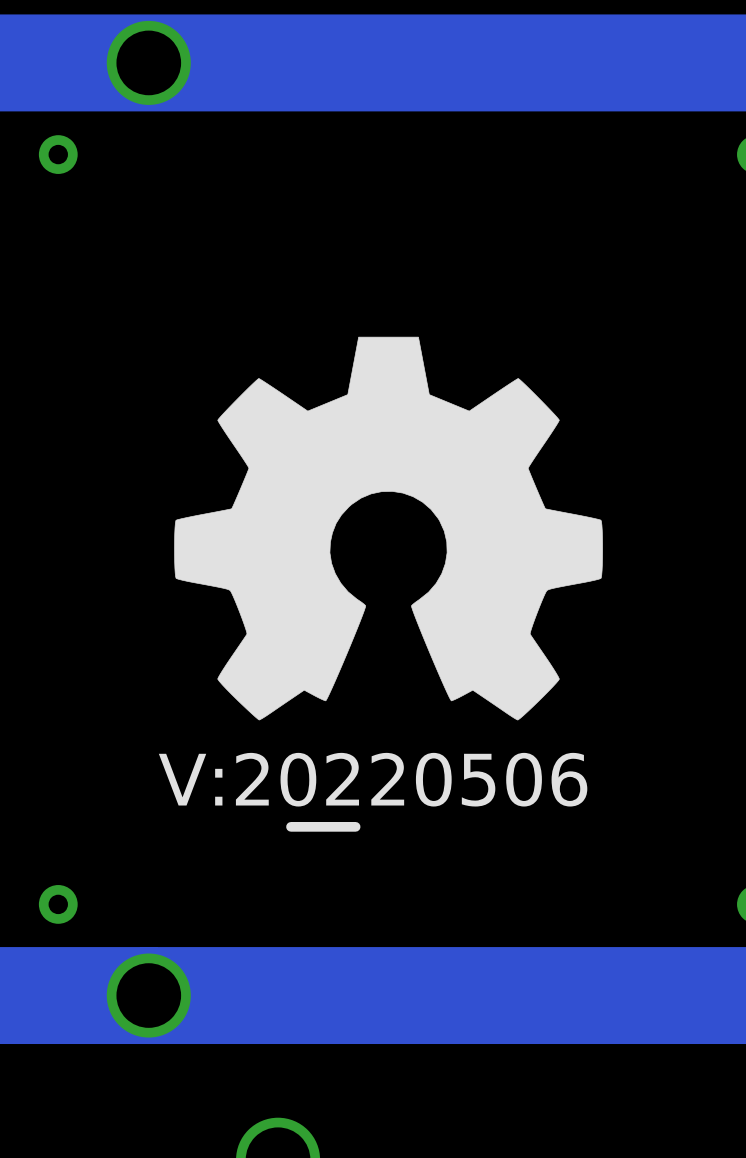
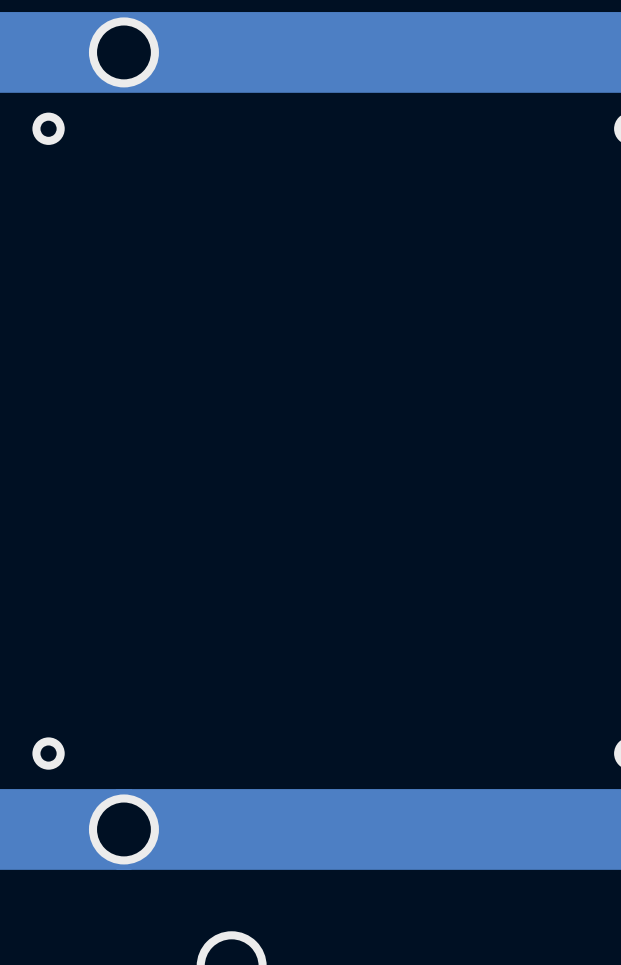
drawing: [174, 336, 603, 832] -> none

